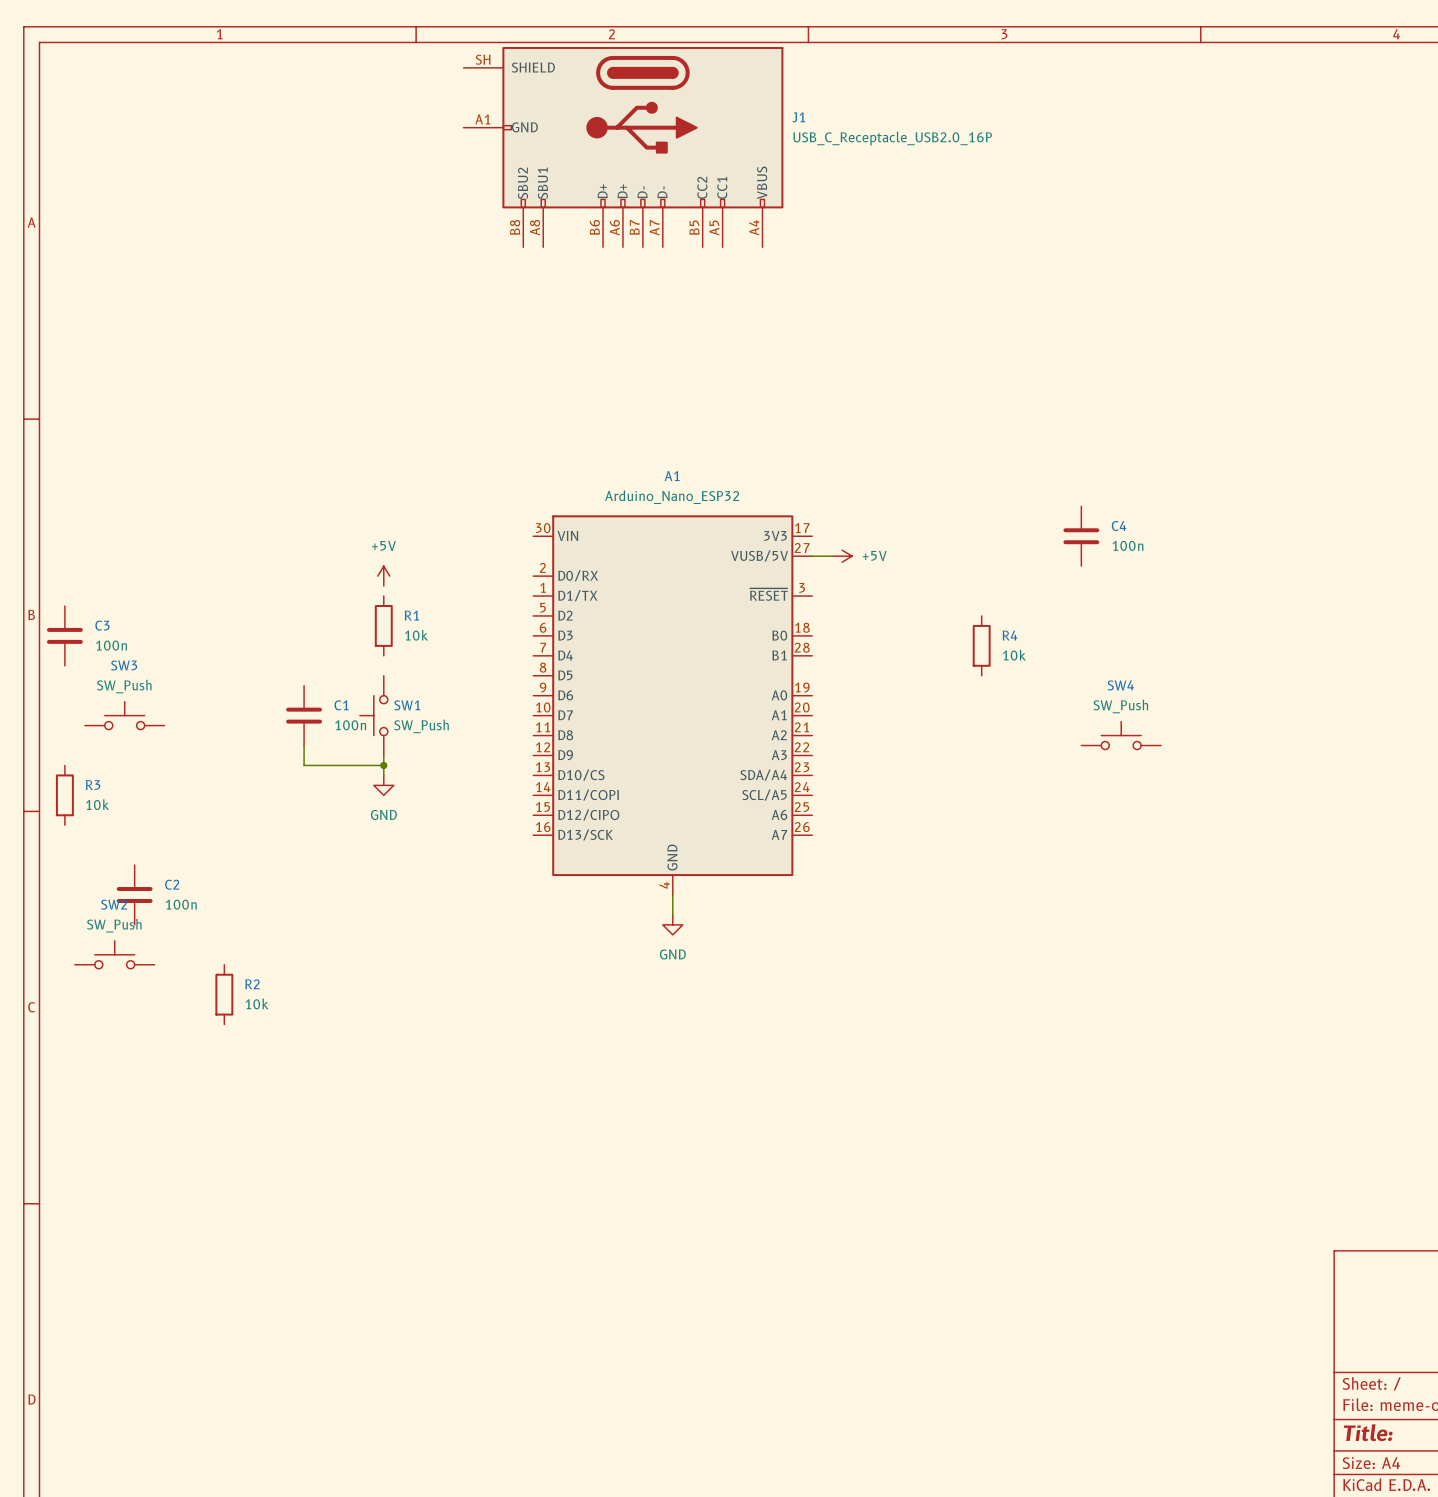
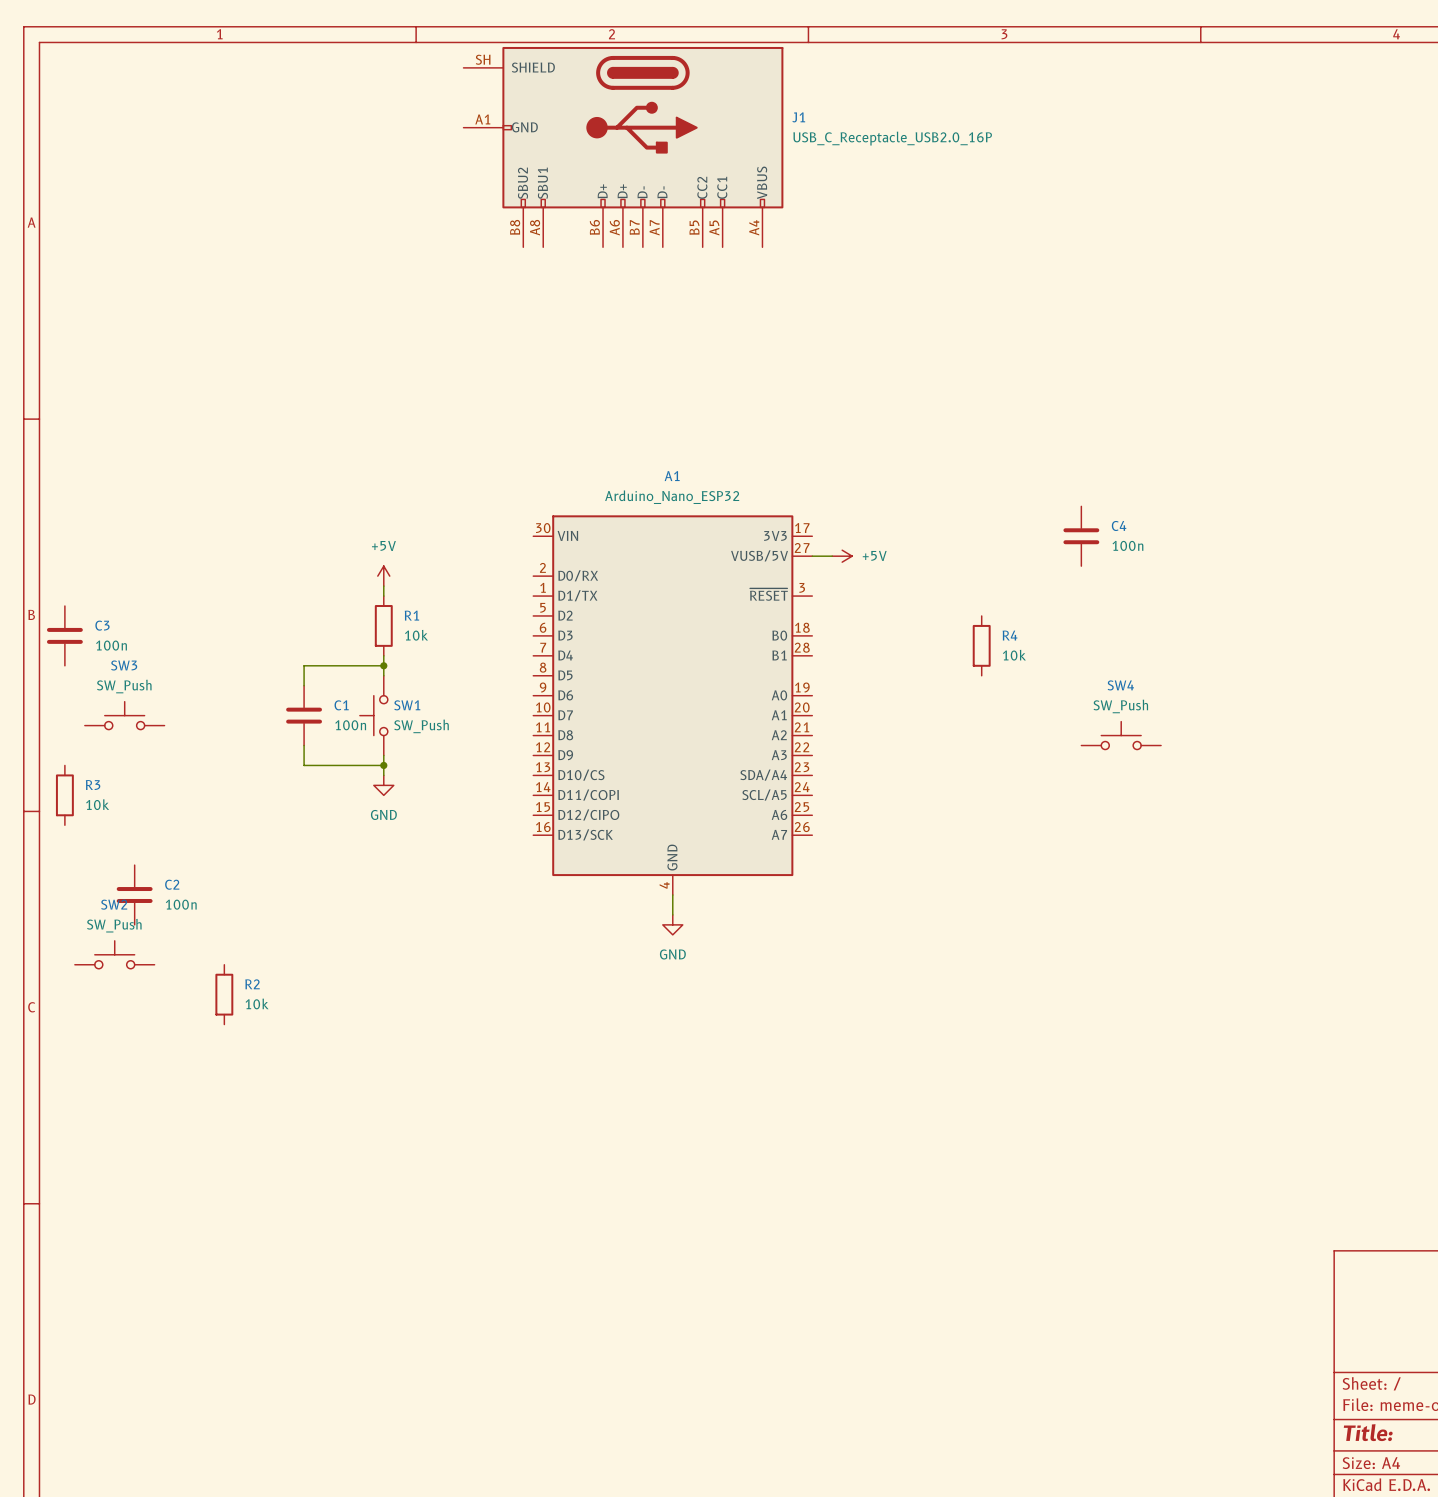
wire: none -> (383, 586) (383, 596)
wire: none -> (383, 655) (383, 675)
wire: none -> (383, 665) (304, 665) (304, 685)
junction: none -> (383, 665)

